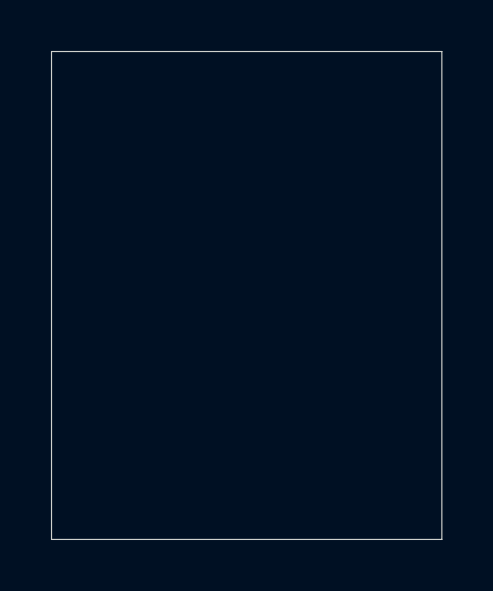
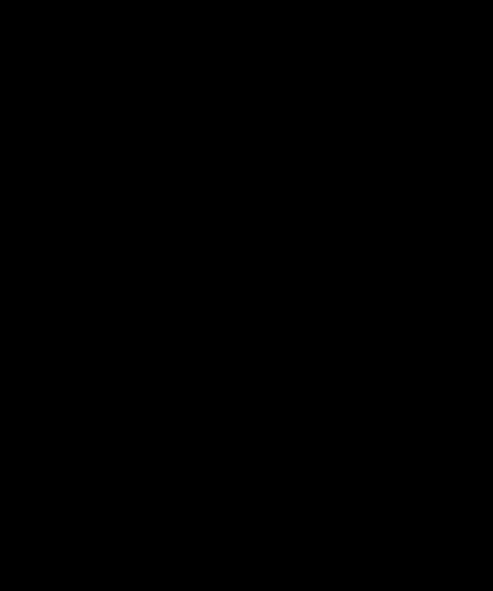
board edge: (441, 51) (51, 51) (51, 539) (441, 539) (441, 51) -> none

